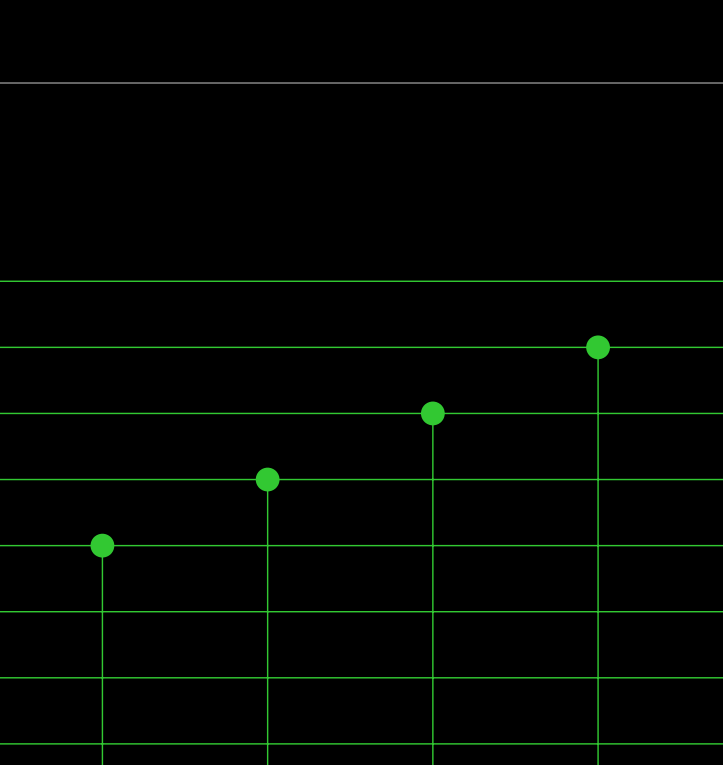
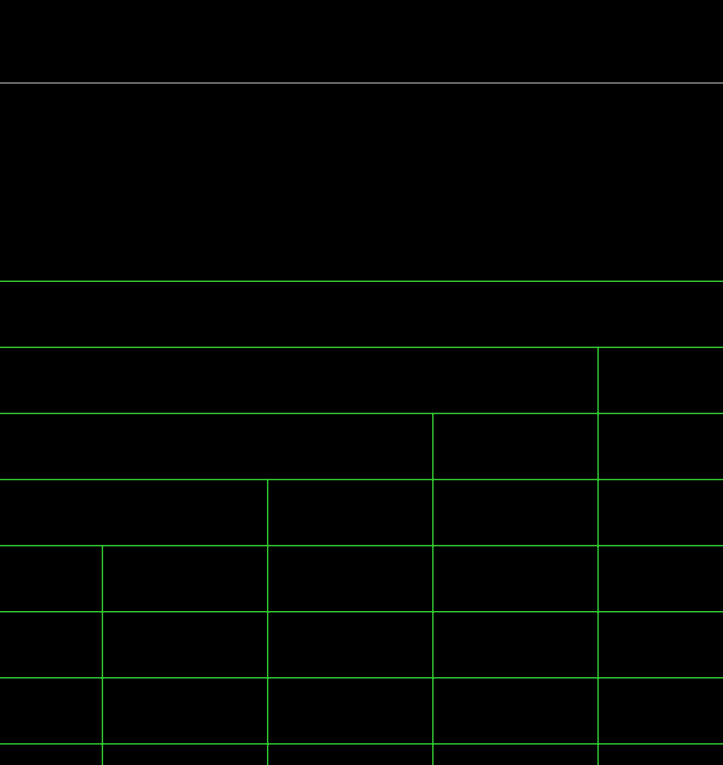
junction: (598, 347) -> none
junction: (432, 413) -> none
junction: (267, 479) -> none
junction: (102, 545) -> none

